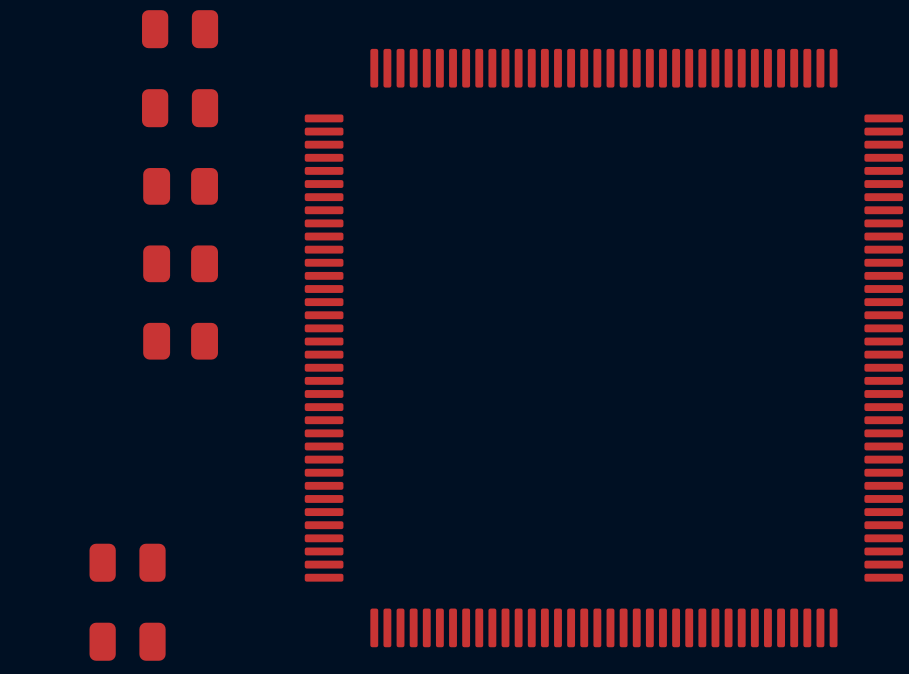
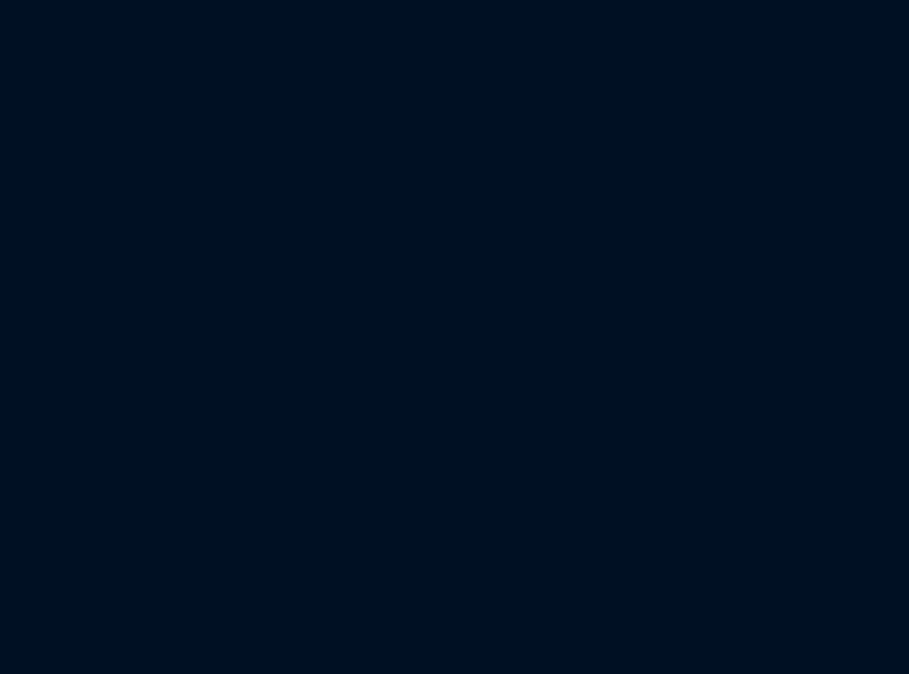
part: (180, 29) -> none
part: (180, 108) -> none
part: (180, 186) -> none
part: (180, 263) -> none
part: (180, 341) -> none
part: (603, 348) -> none
part: (127, 562) -> none
part: (127, 641) -> none

